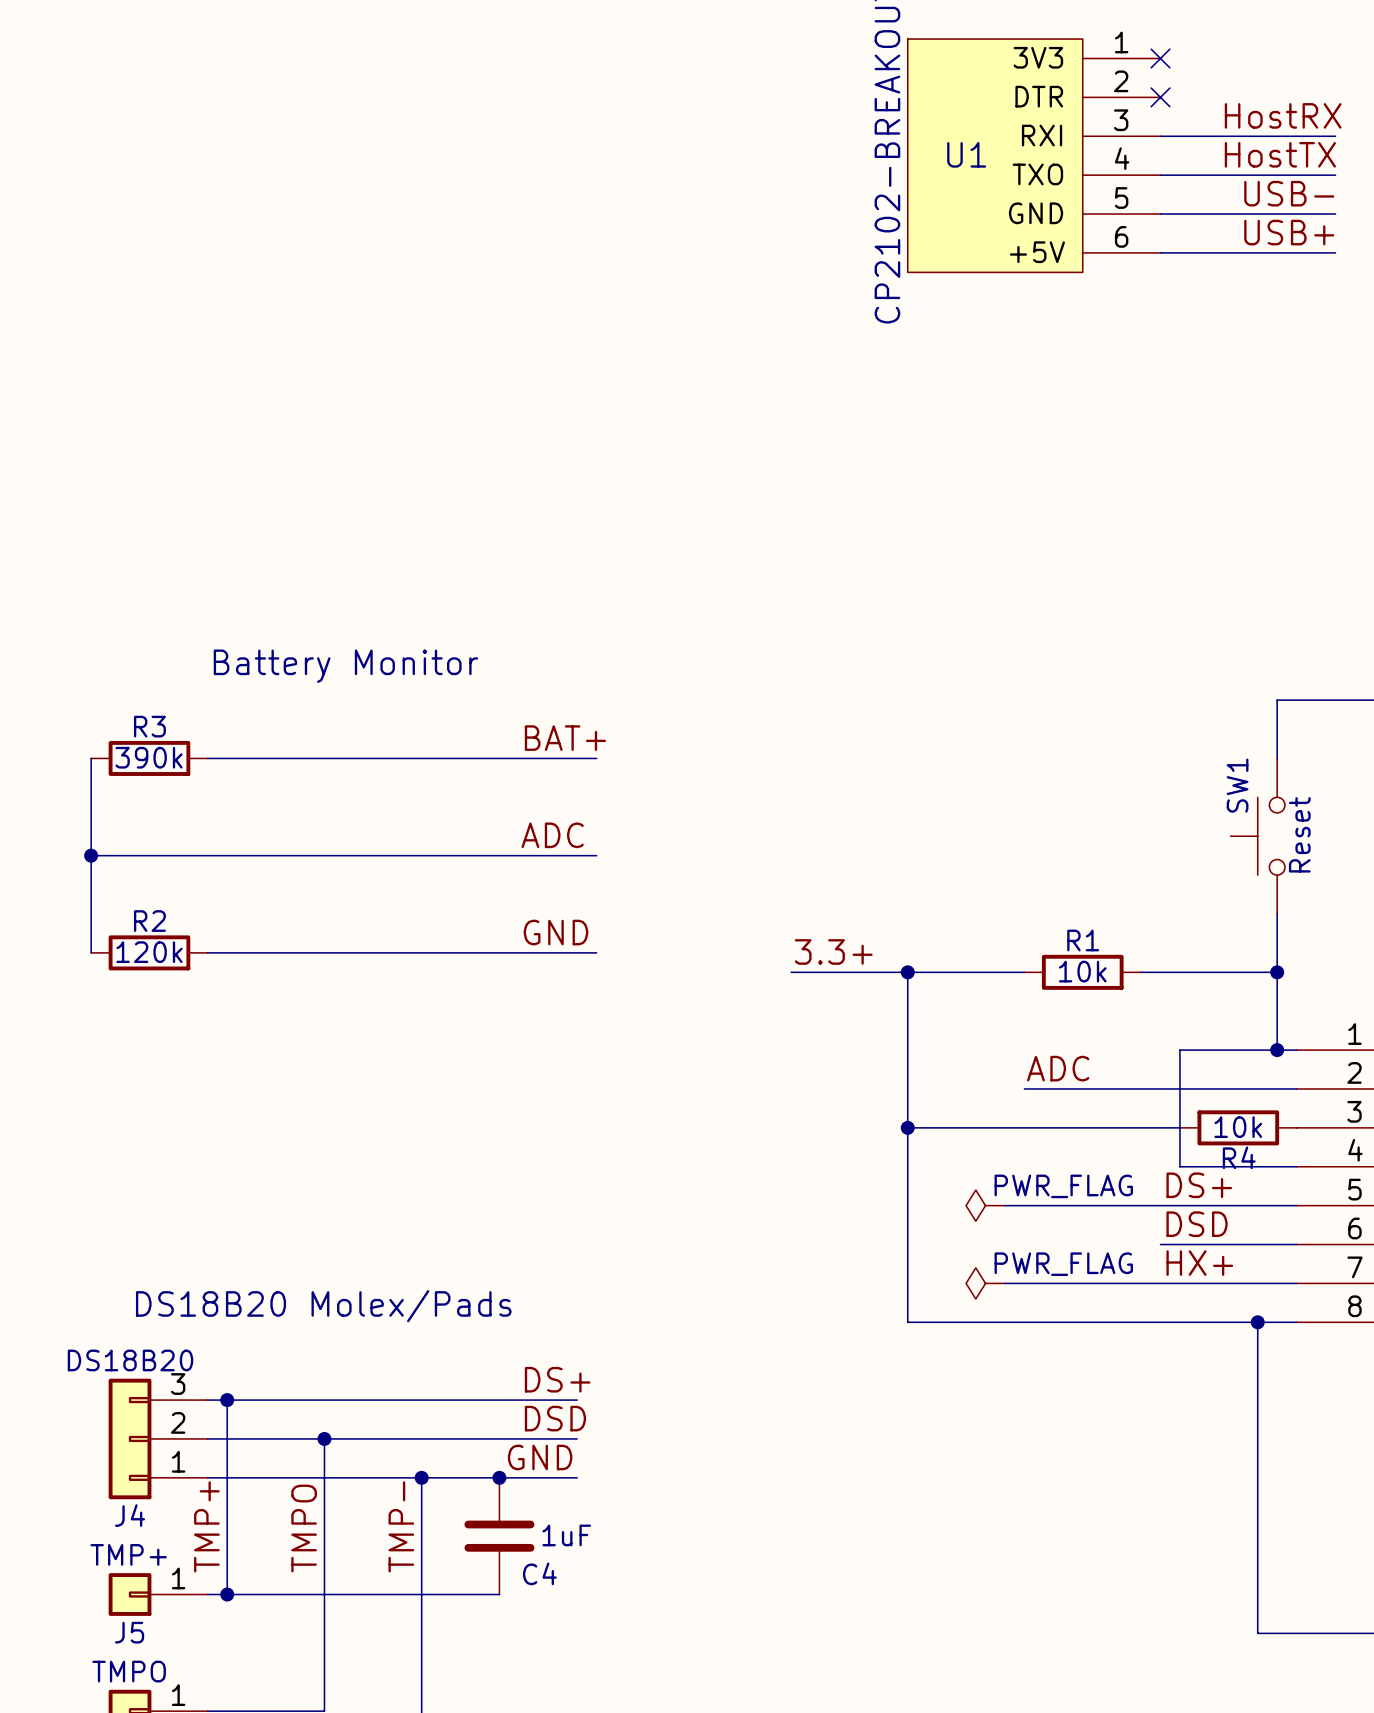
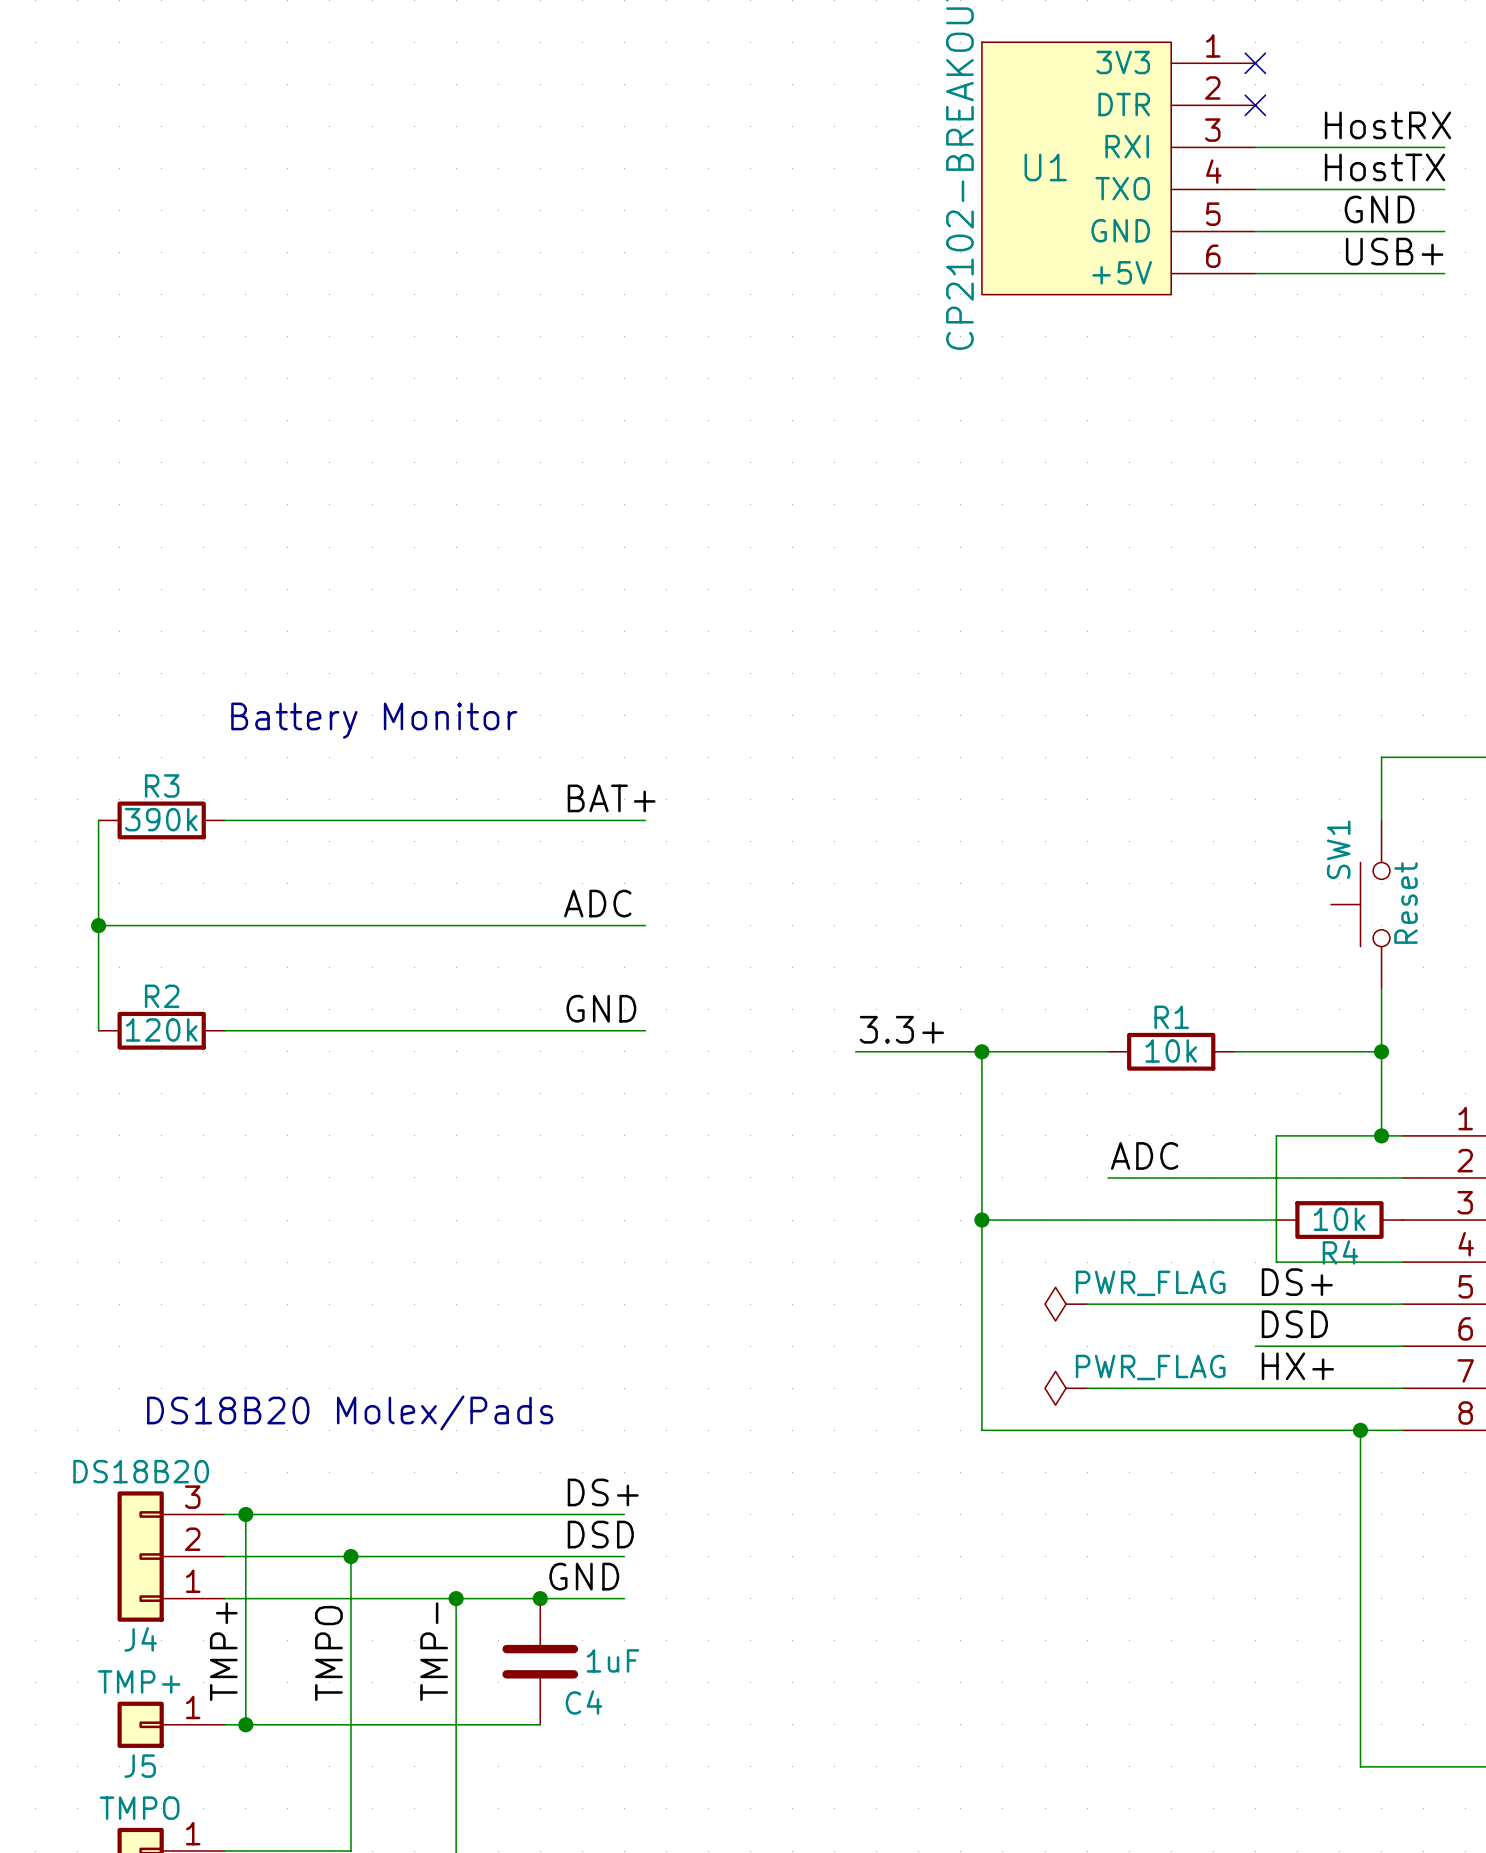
label: USB- (1289, 193) -> GND (1379, 209)

